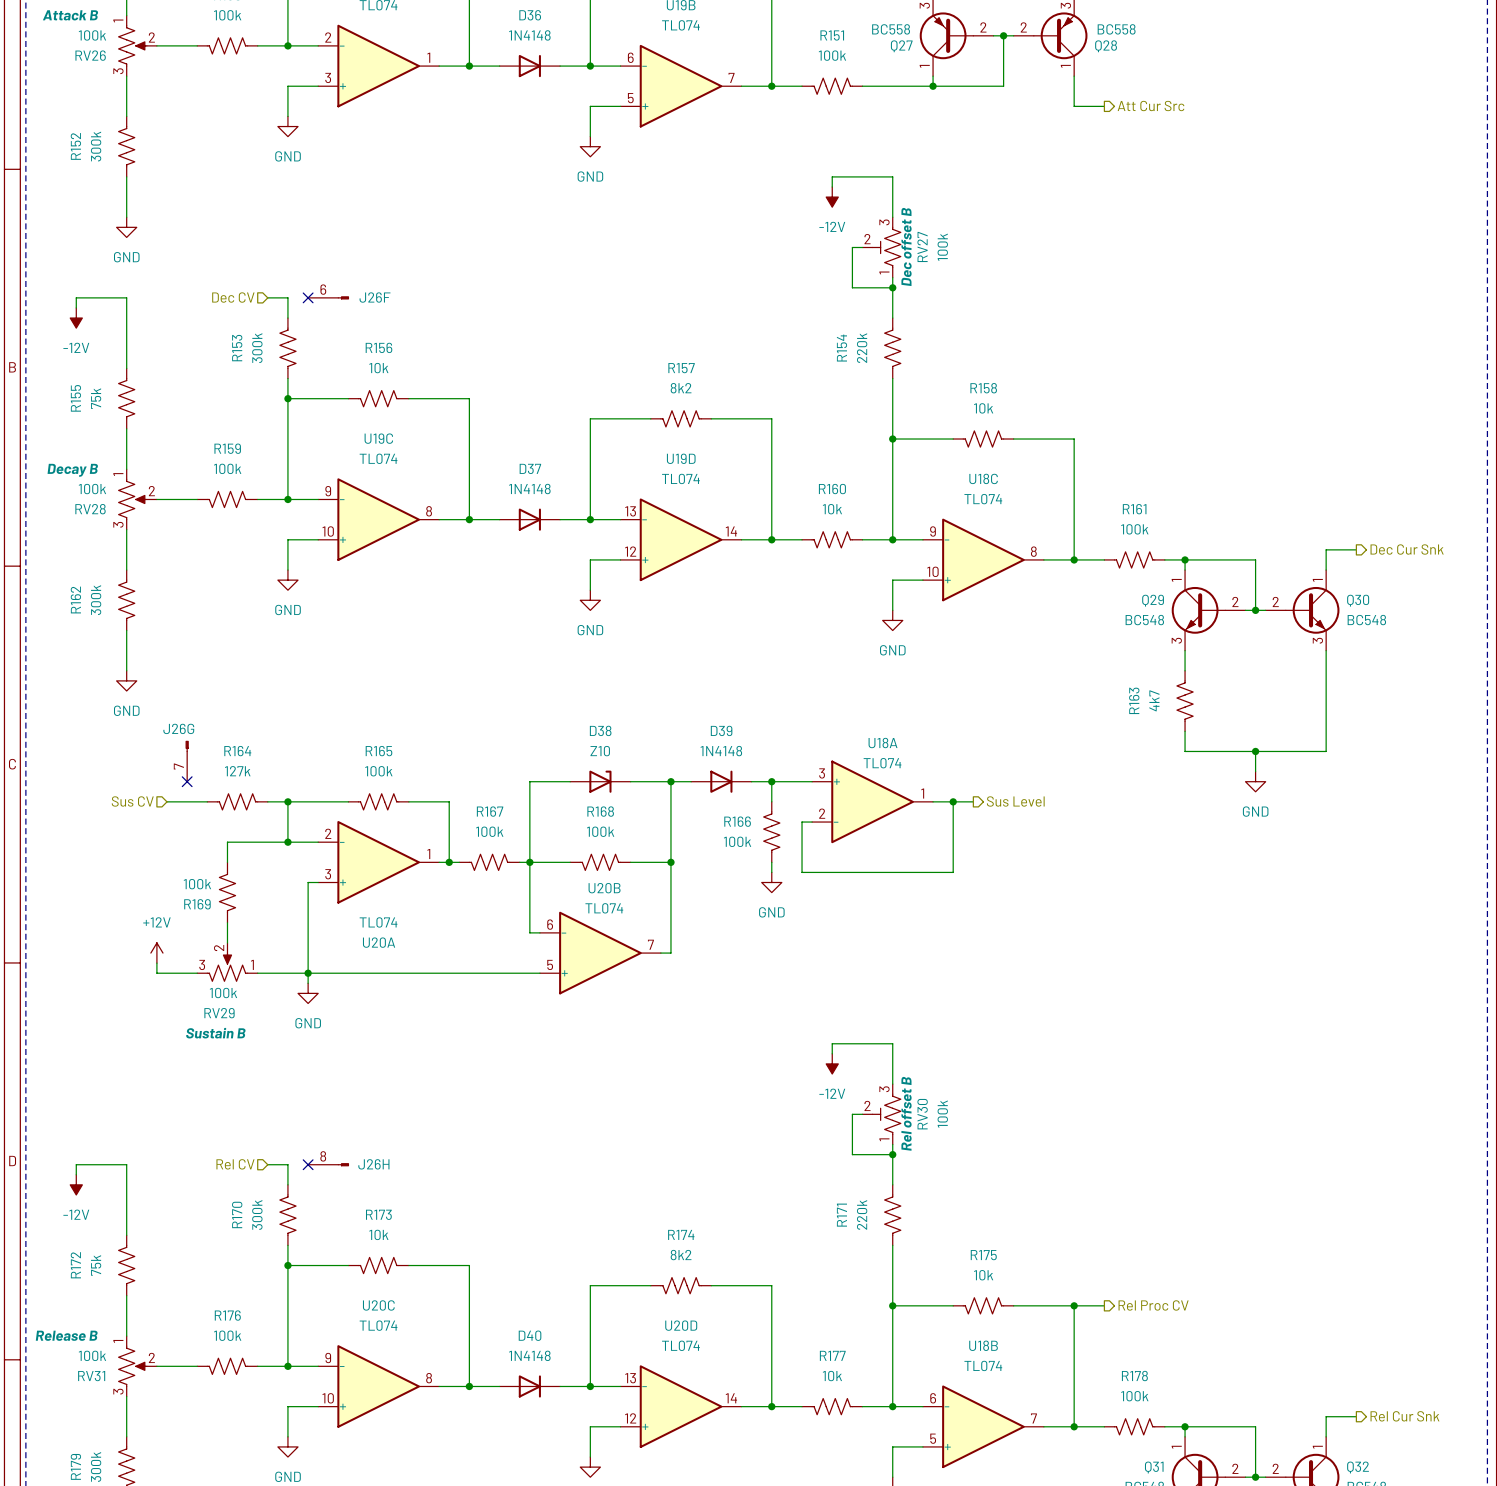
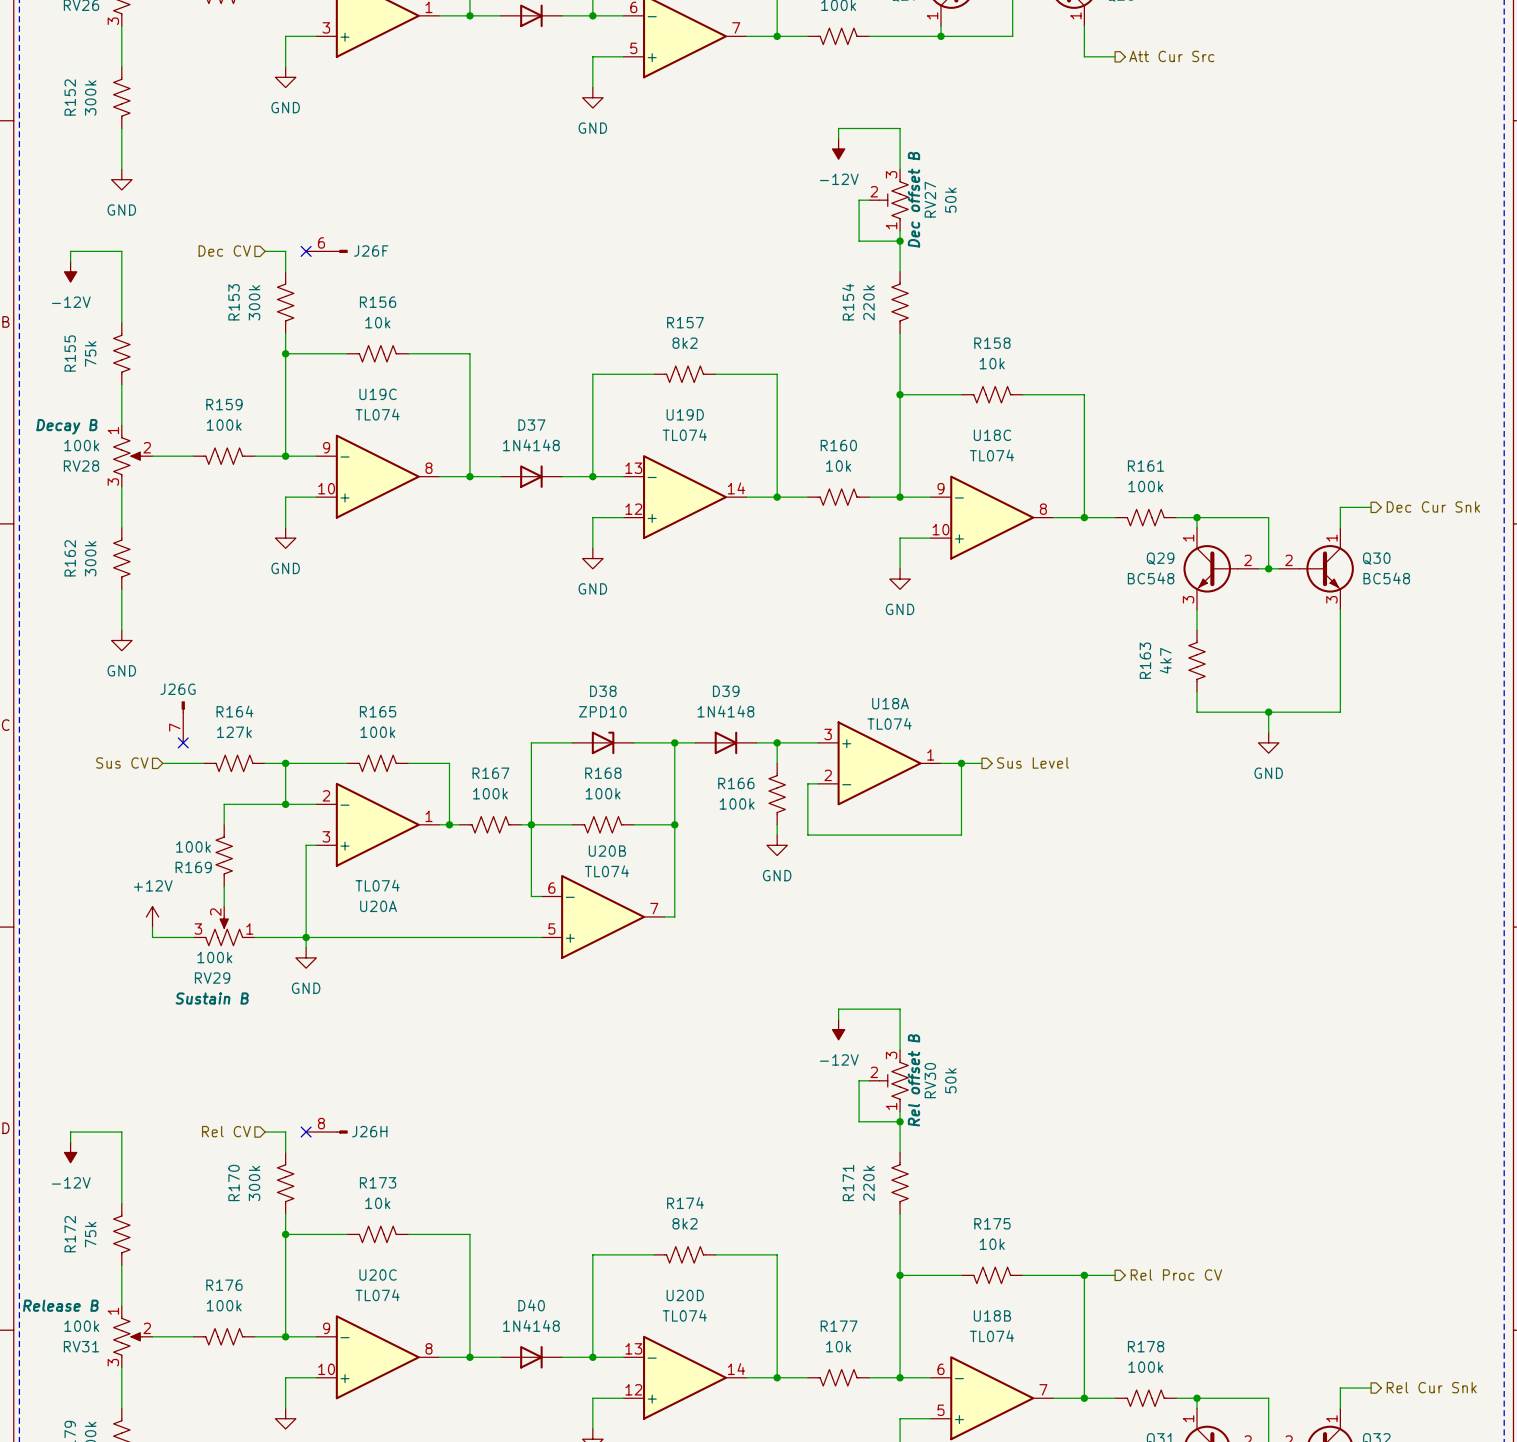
RV27 value: 100k (942, 247) -> 50k (950, 200)
D38 value: Z10 (600, 751) -> ZPD10 (602, 711)
RV30 value: 100k (942, 1114) -> 50k (950, 1080)

